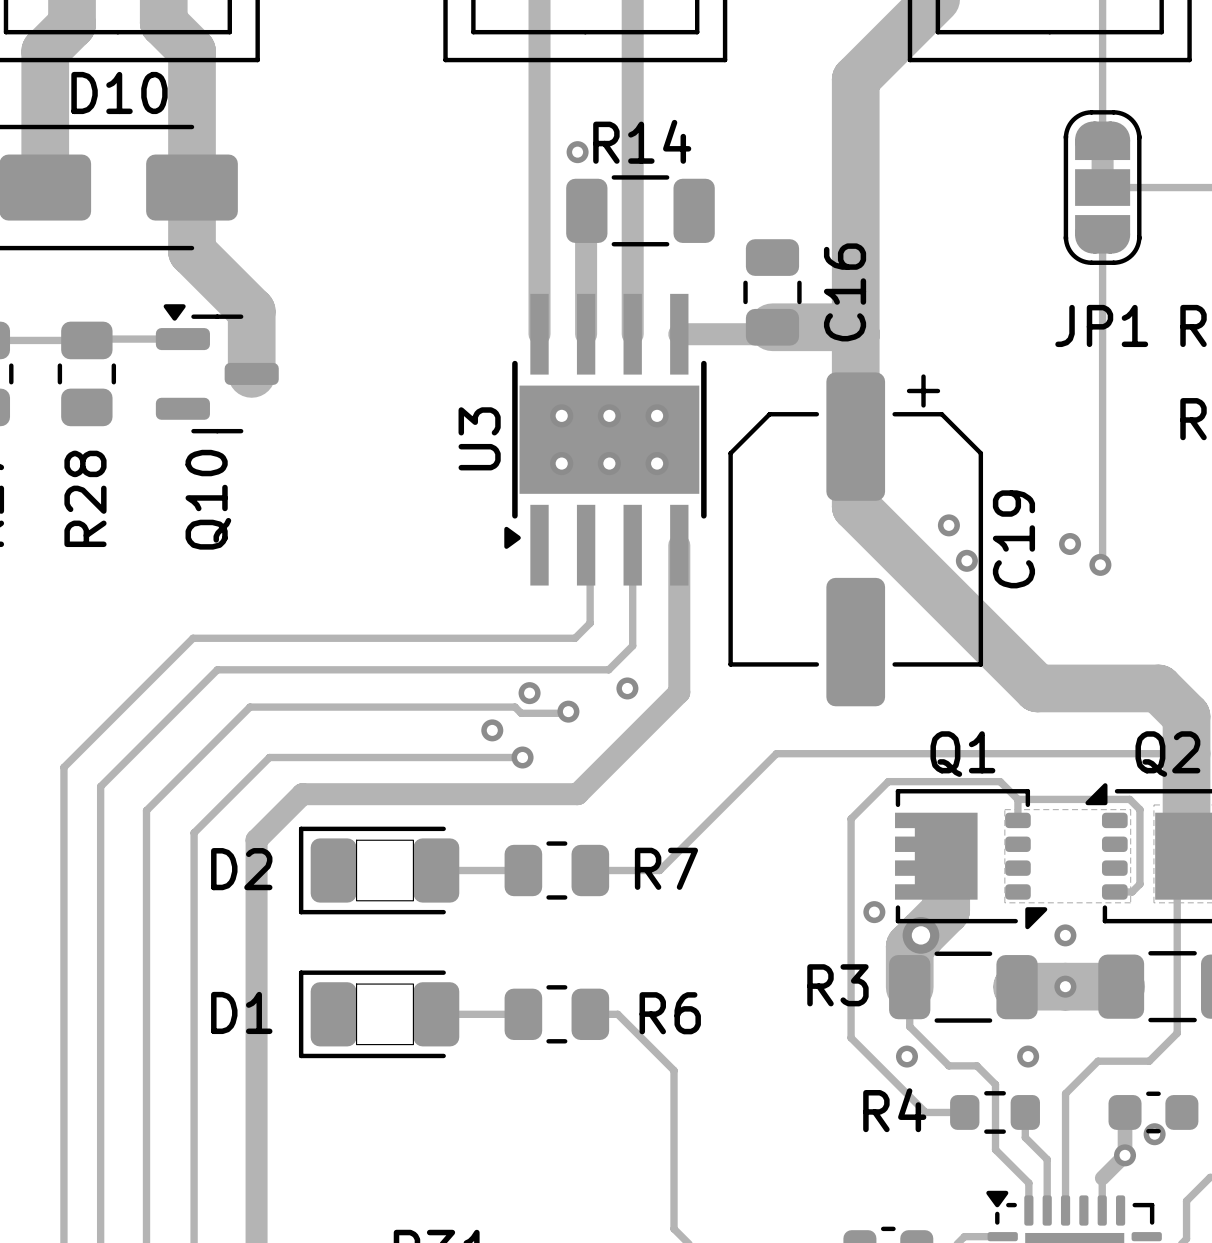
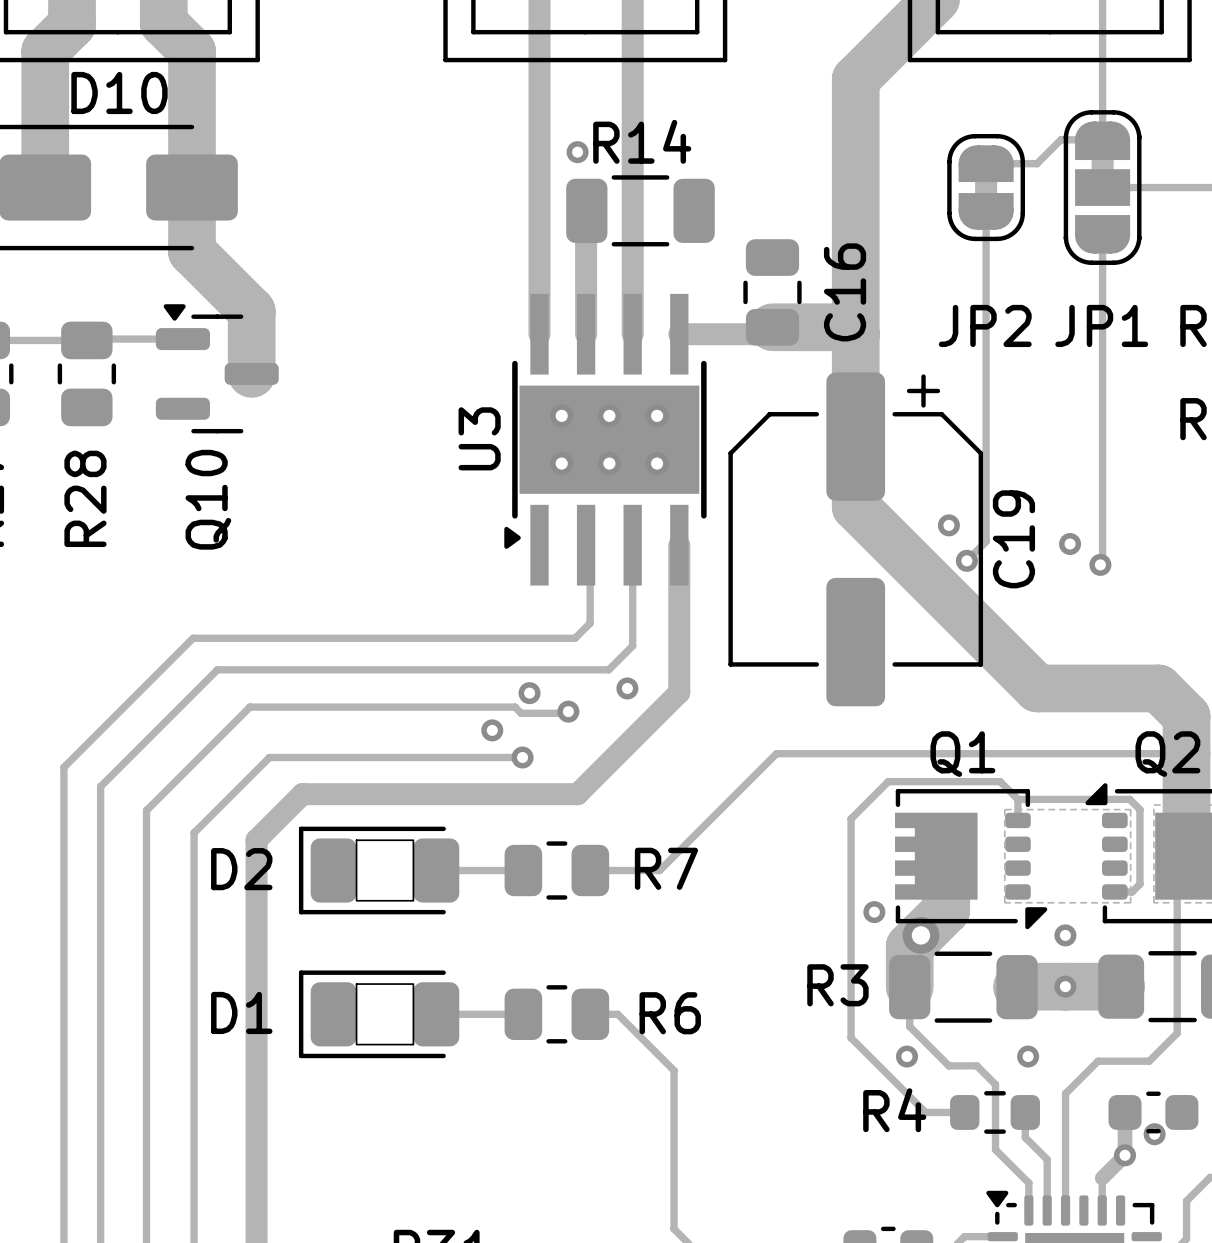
track: none -> (1102, 139) (1060, 139) (1037, 163) (986, 163)
JP2: none -> (986, 187)
track: none -> (986, 211) (986, 541) (966, 560)

